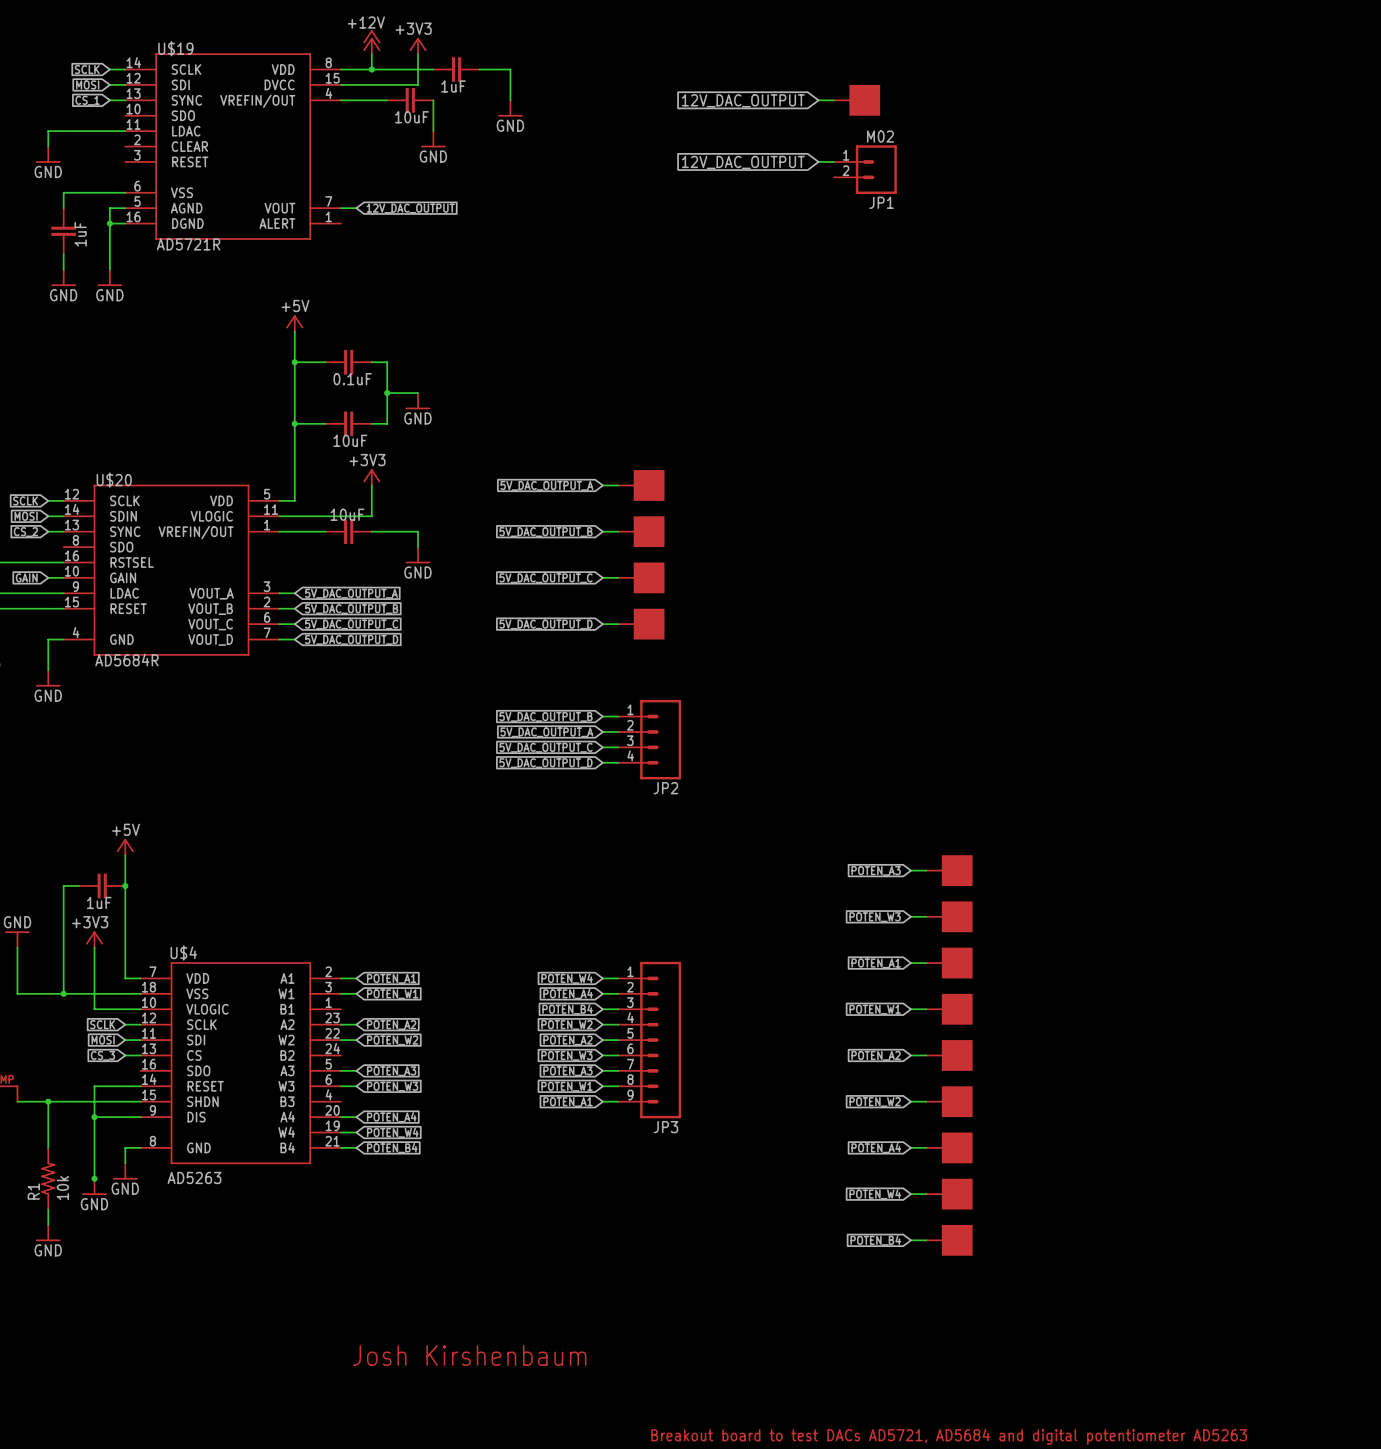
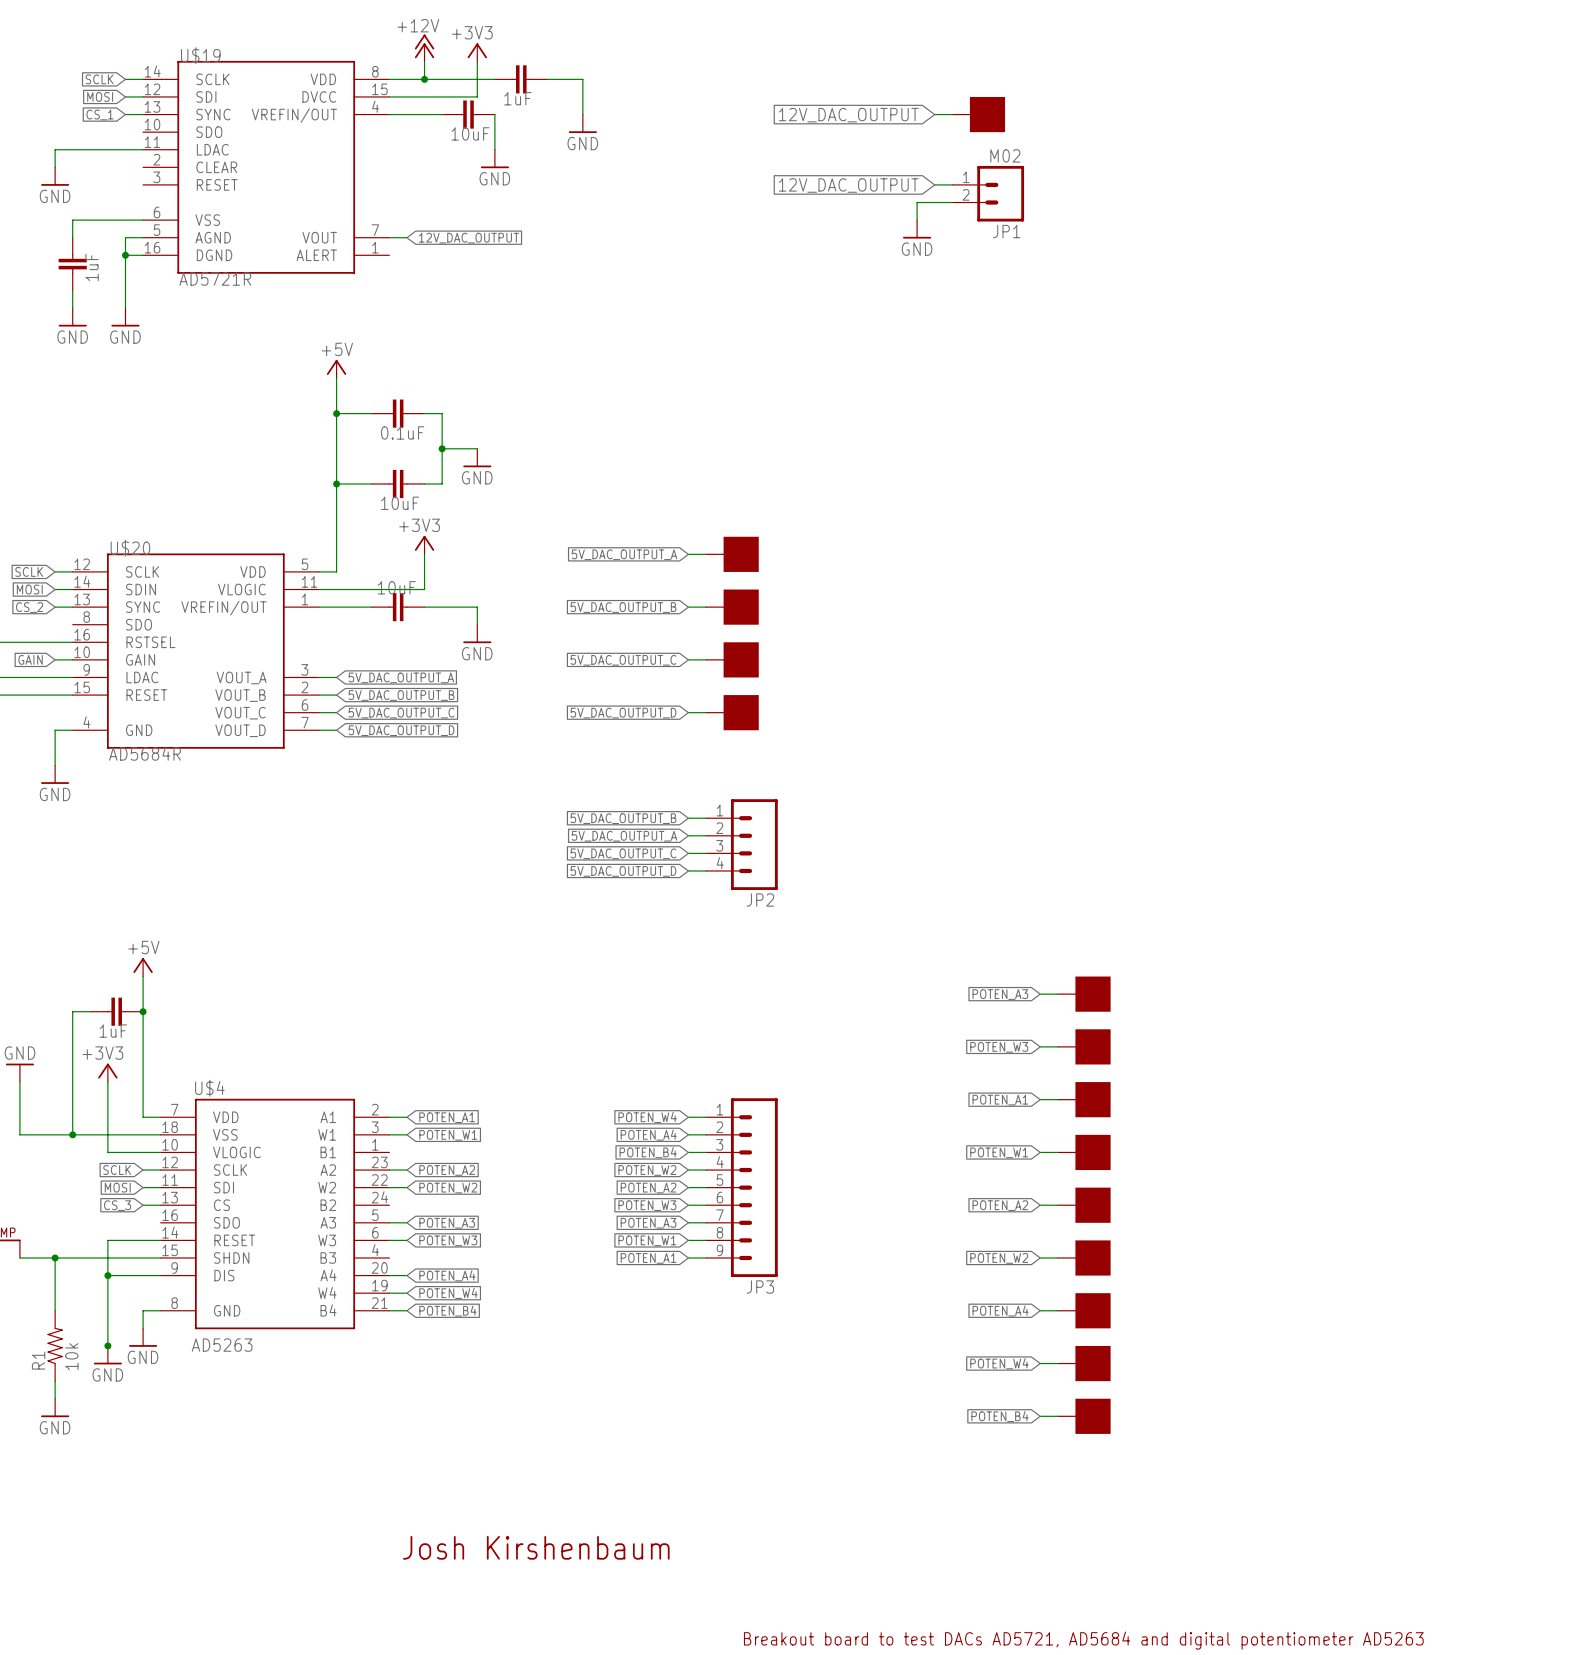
wire: none -> (952, 202) (917, 202) (917, 220)
power symbol: none -> GND (917, 229)

